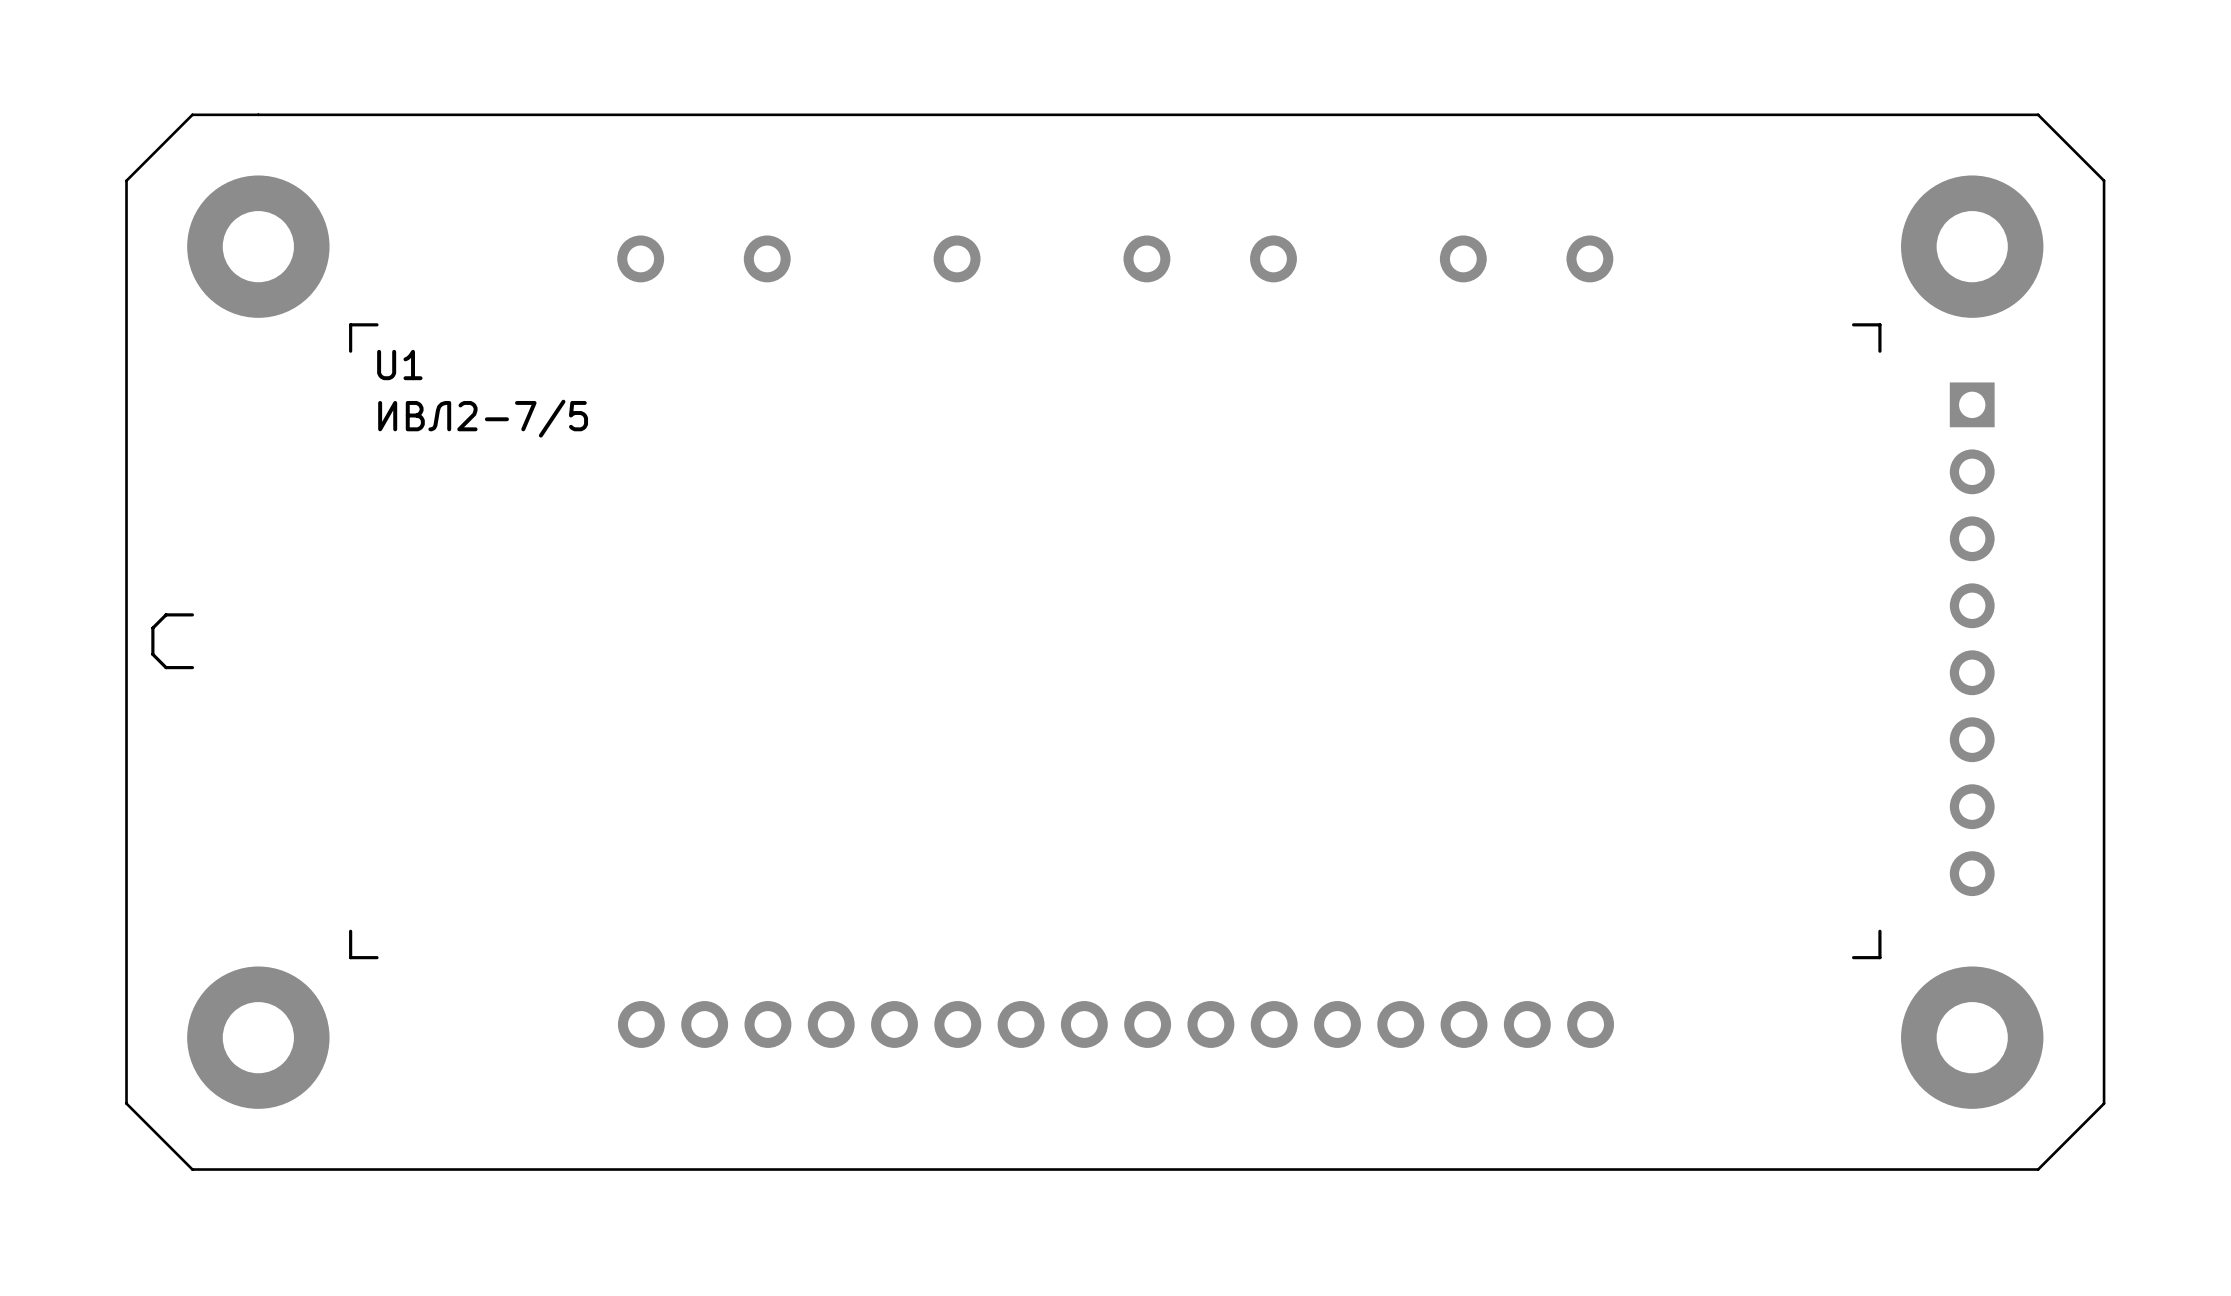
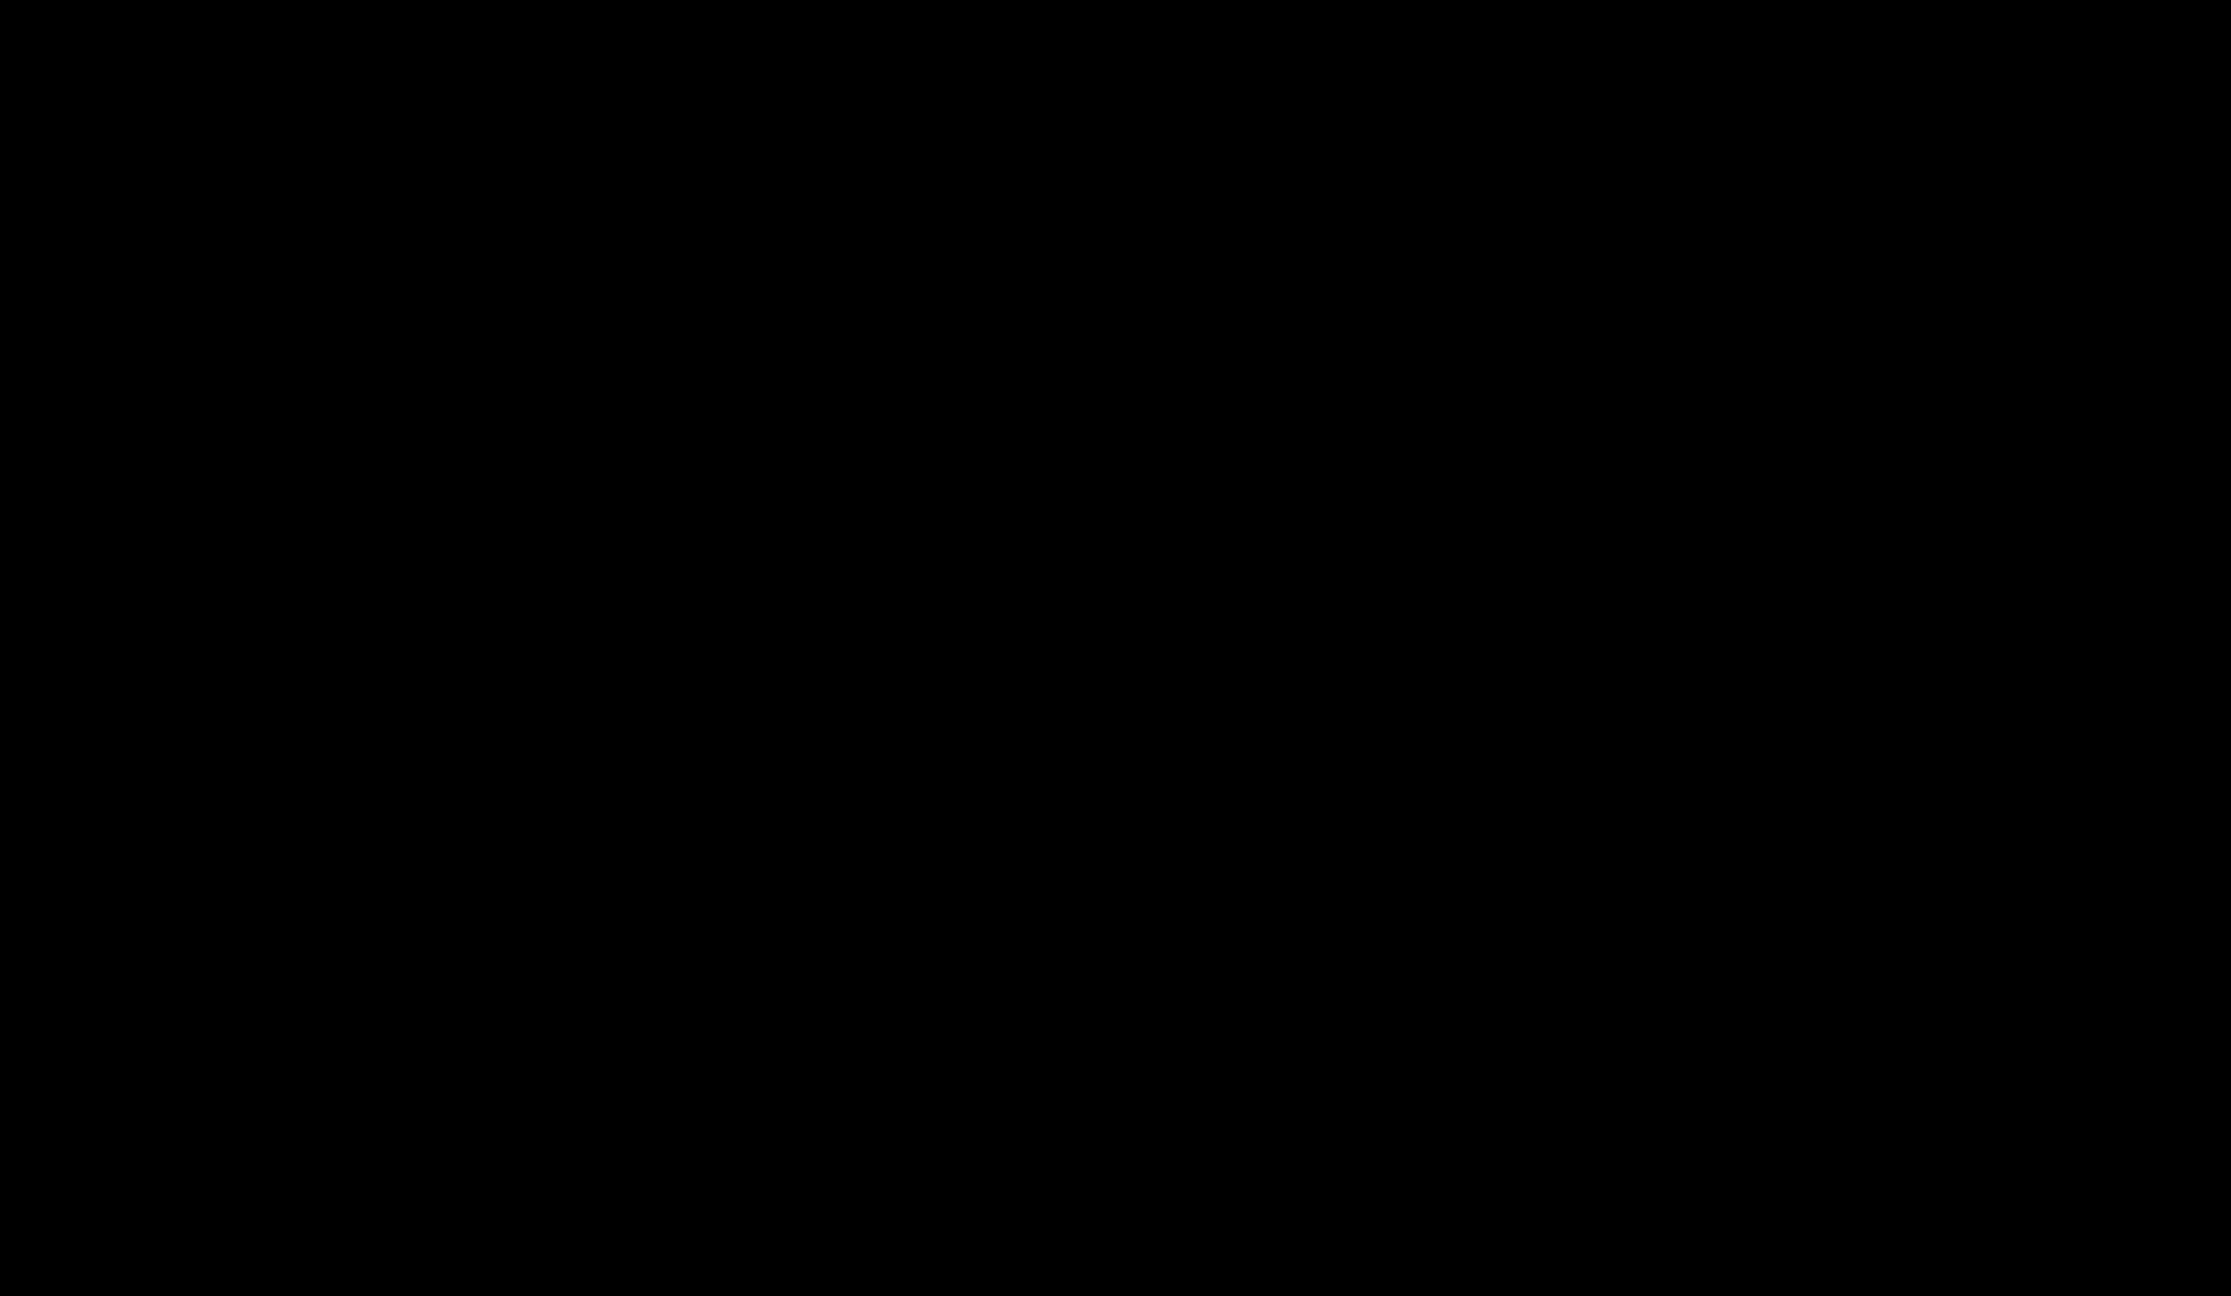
board edge: (2038, 114) (192, 114) (126, 180) (126, 1103) (192, 1169) (2038, 1169) (2104, 1103) (2104, 180) (2038, 114) -> none
part: (258, 246) -> none
part: (1972, 246) -> none
part: (1972, 639) -> none
U1: (1016, 641) -> none
part: (258, 1037) -> none
part: (1972, 1037) -> none

